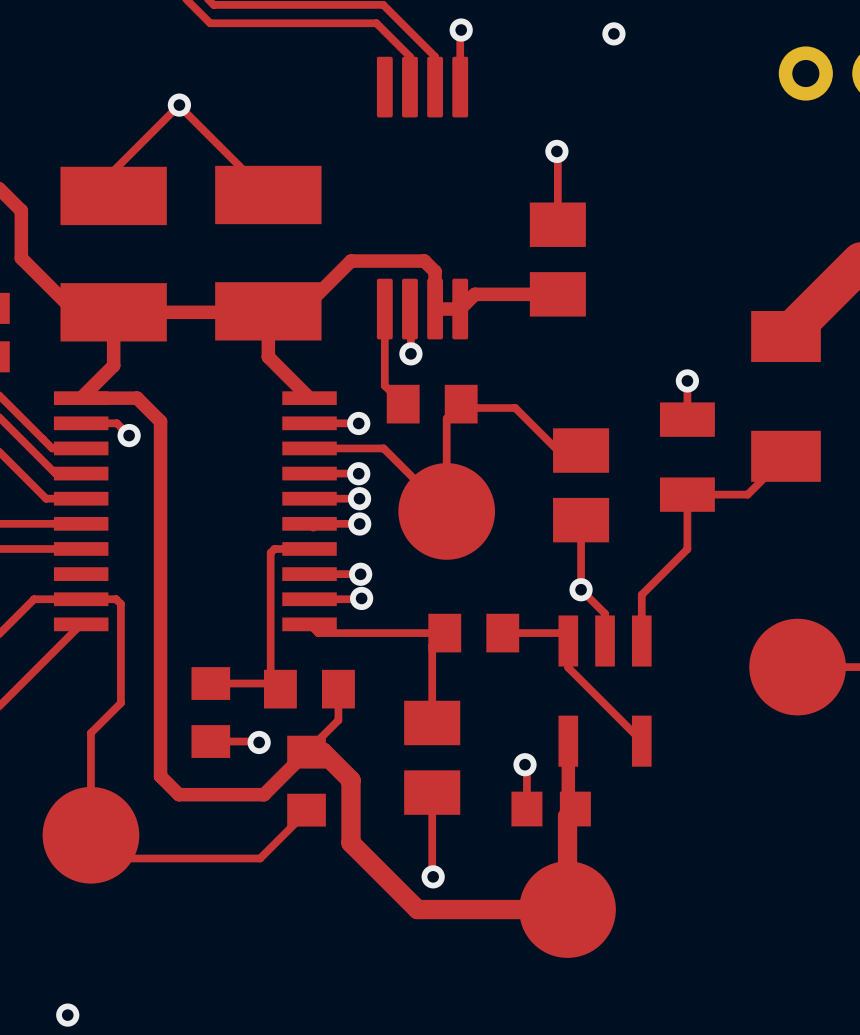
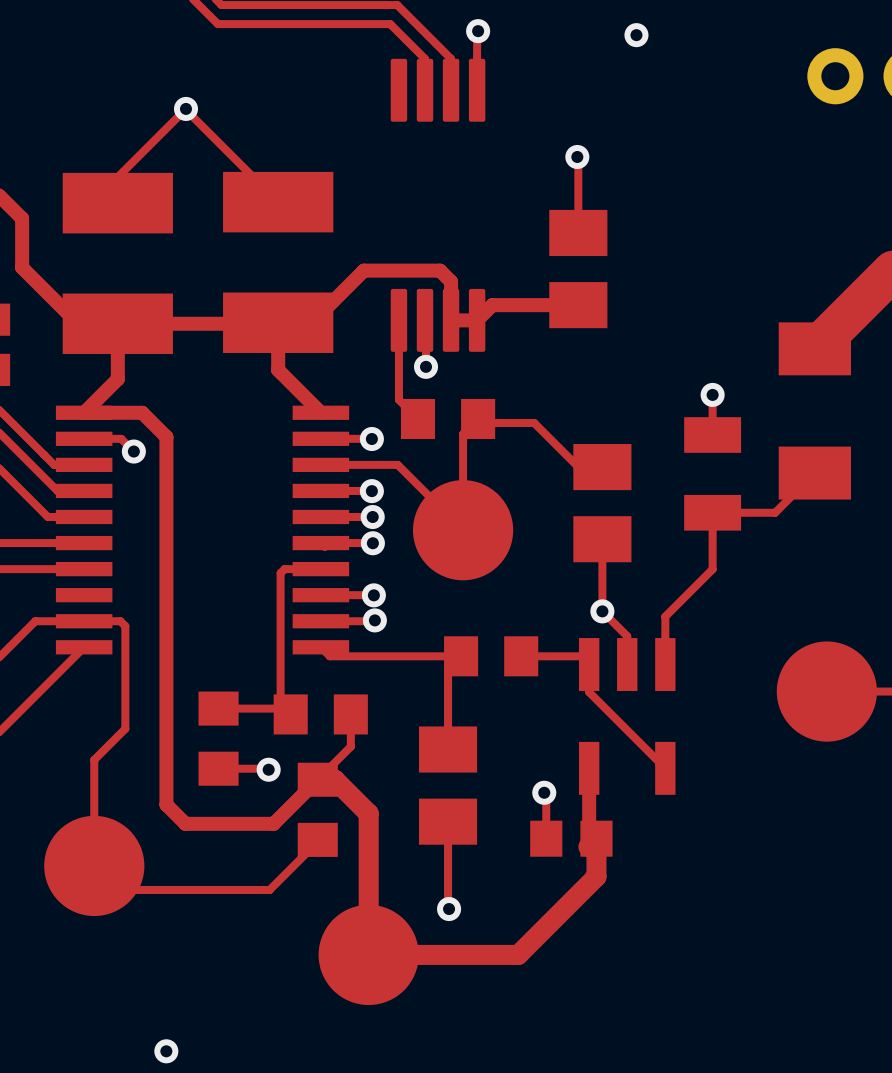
top track: (350, 780) (350, 843) (417, 909) (567, 909) (567, 816) -> (363, 808) (368, 813) (368, 954) (518, 954) (596, 876) (596, 838)
part position: (567, 909) -> (368, 954)
via position: (67, 1015) -> (166, 1051)

